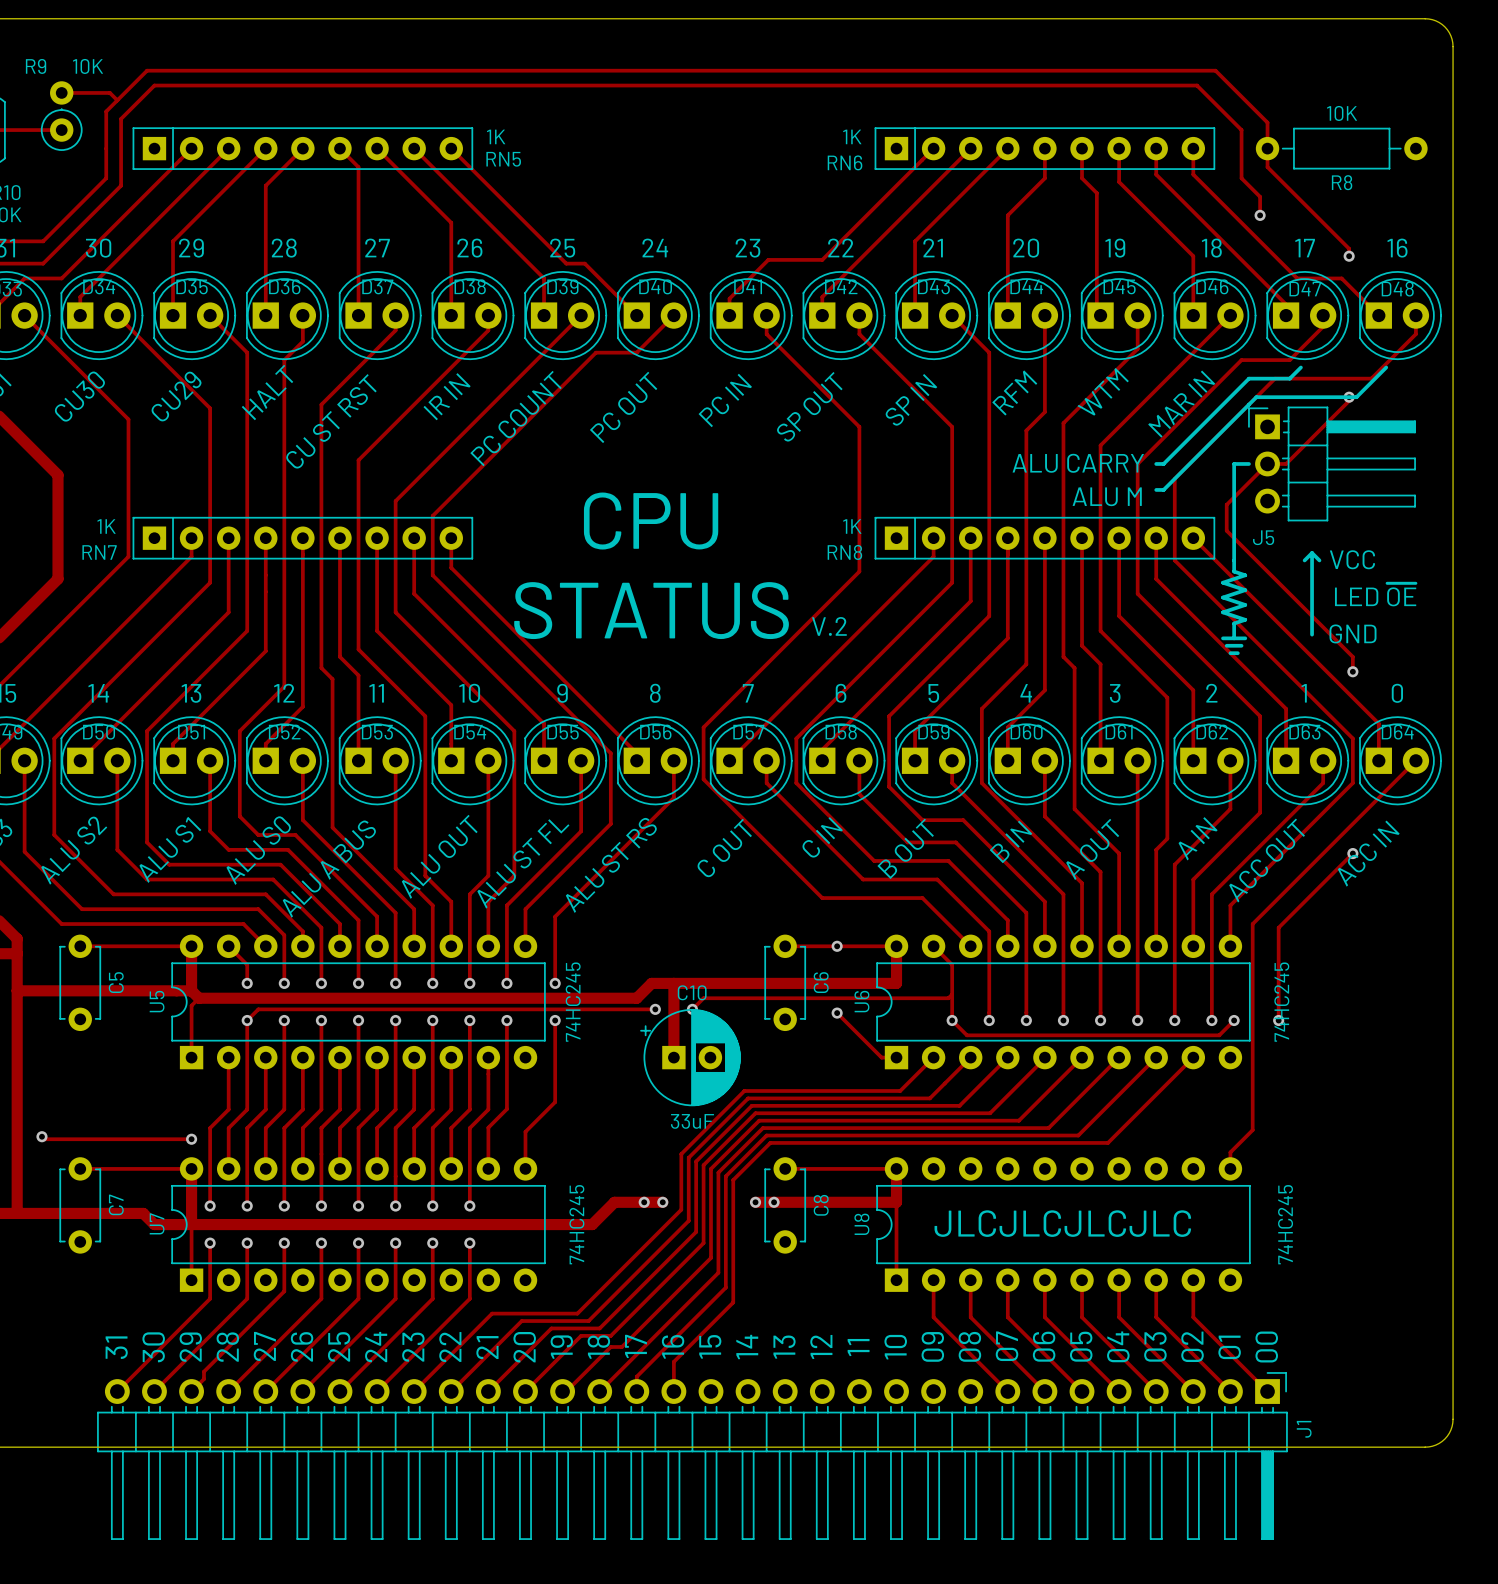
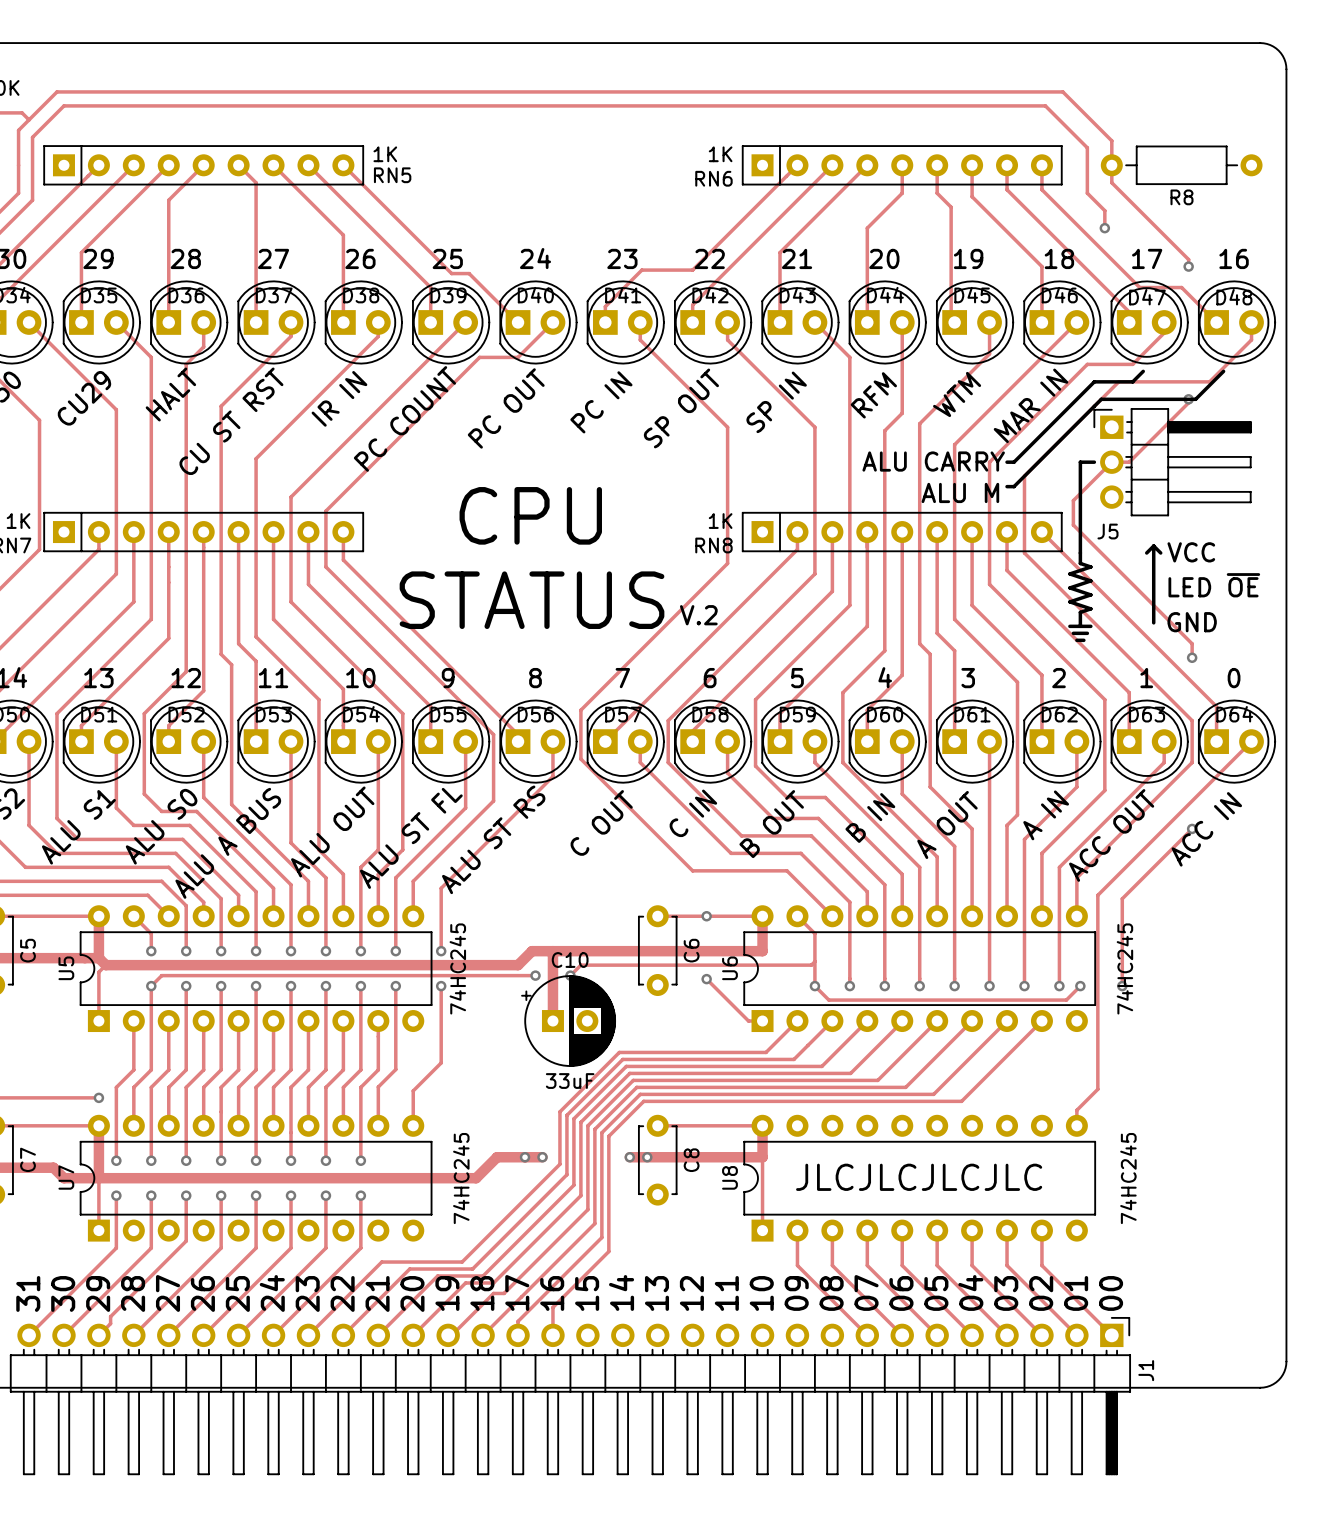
R8 value: 10K (1342, 113) -> none

